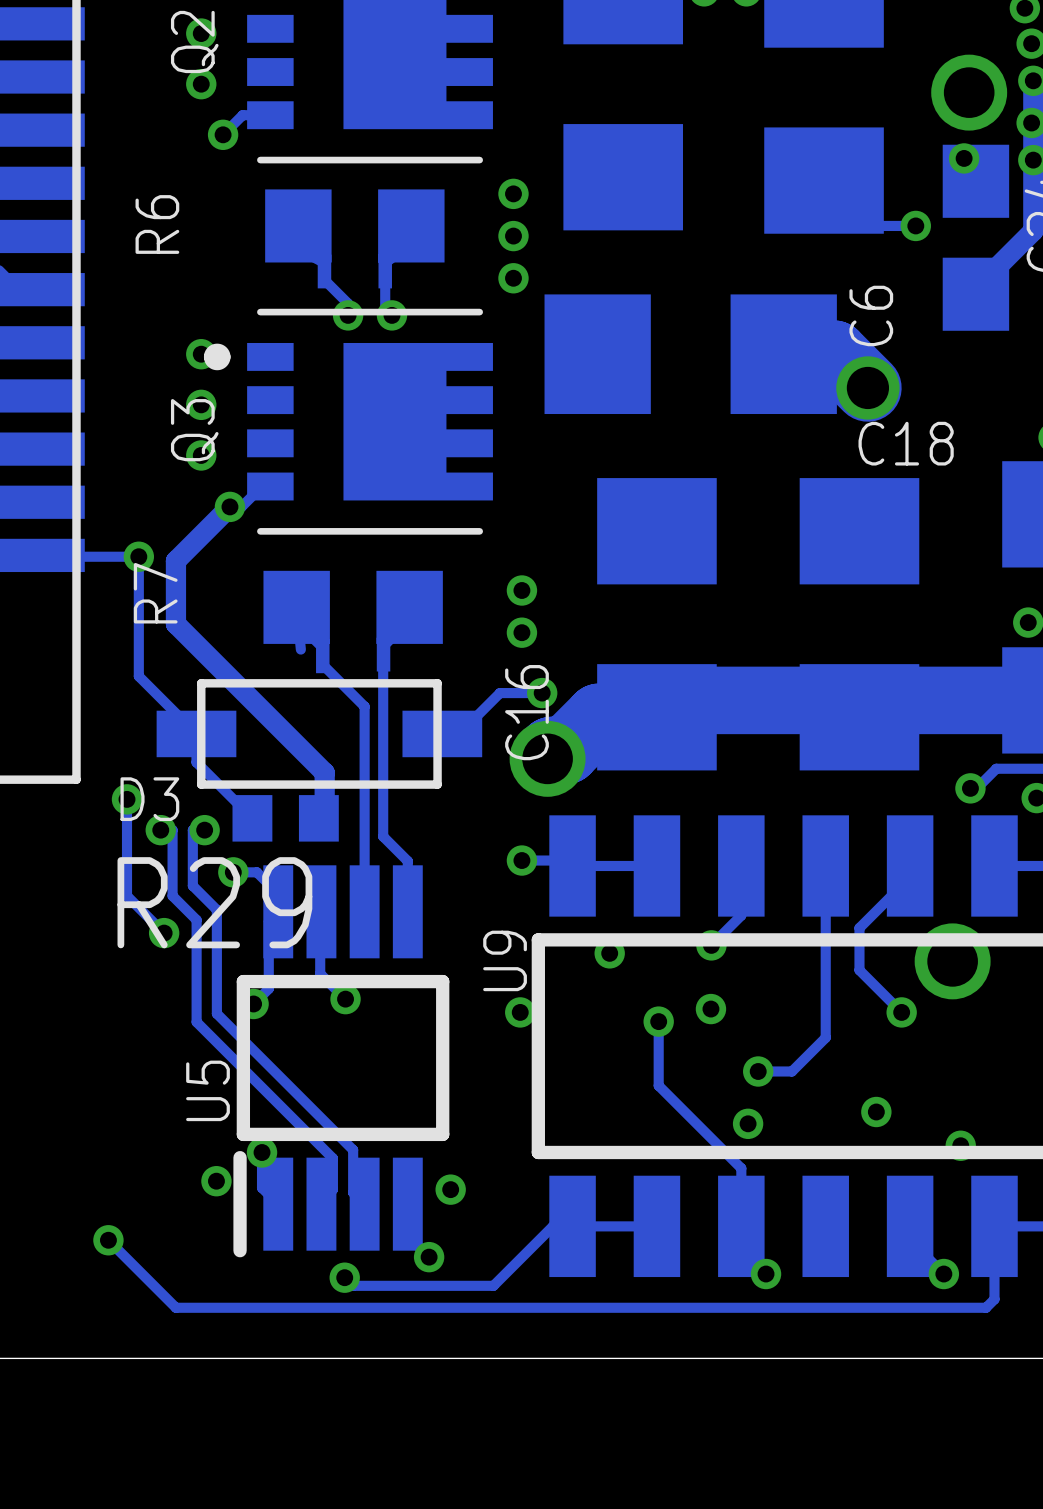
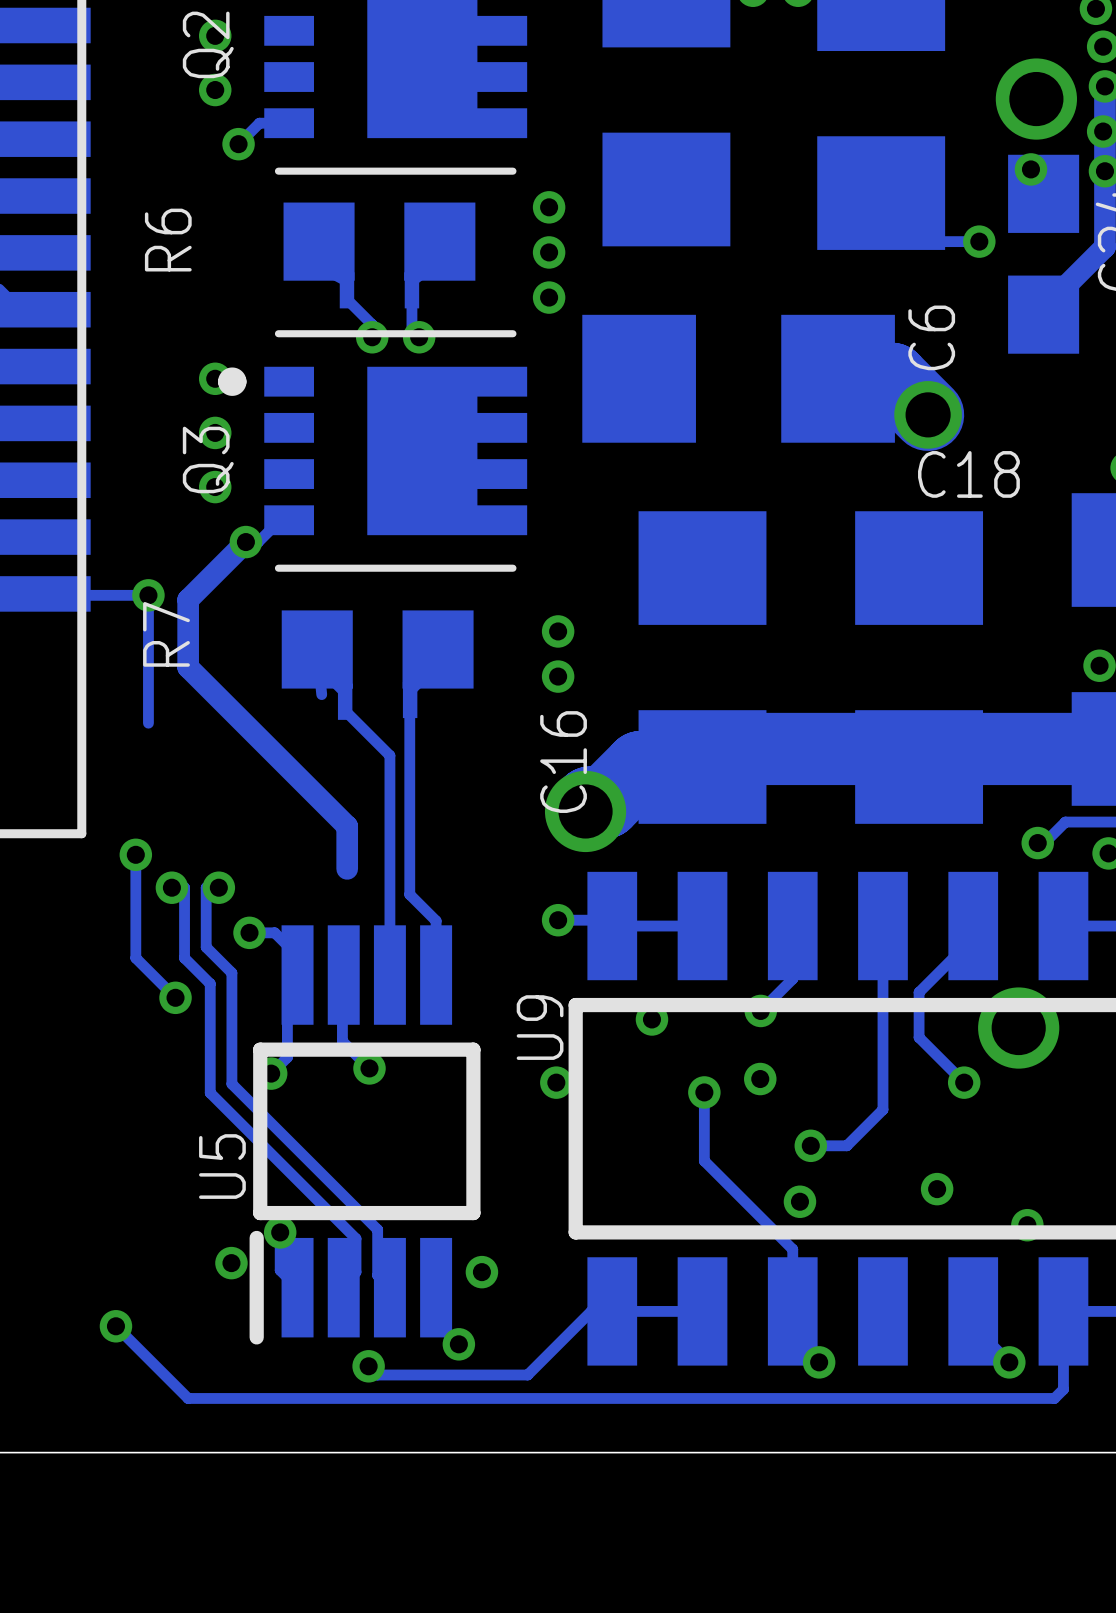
track: (138, 676) (196, 733) (196, 762) (252, 818) -> none
track: (542, 693) (499, 693) (459, 733) (442, 733) -> none
via: (542, 693) -> none
D3: (319, 733) -> none
R29: (285, 818) -> none

